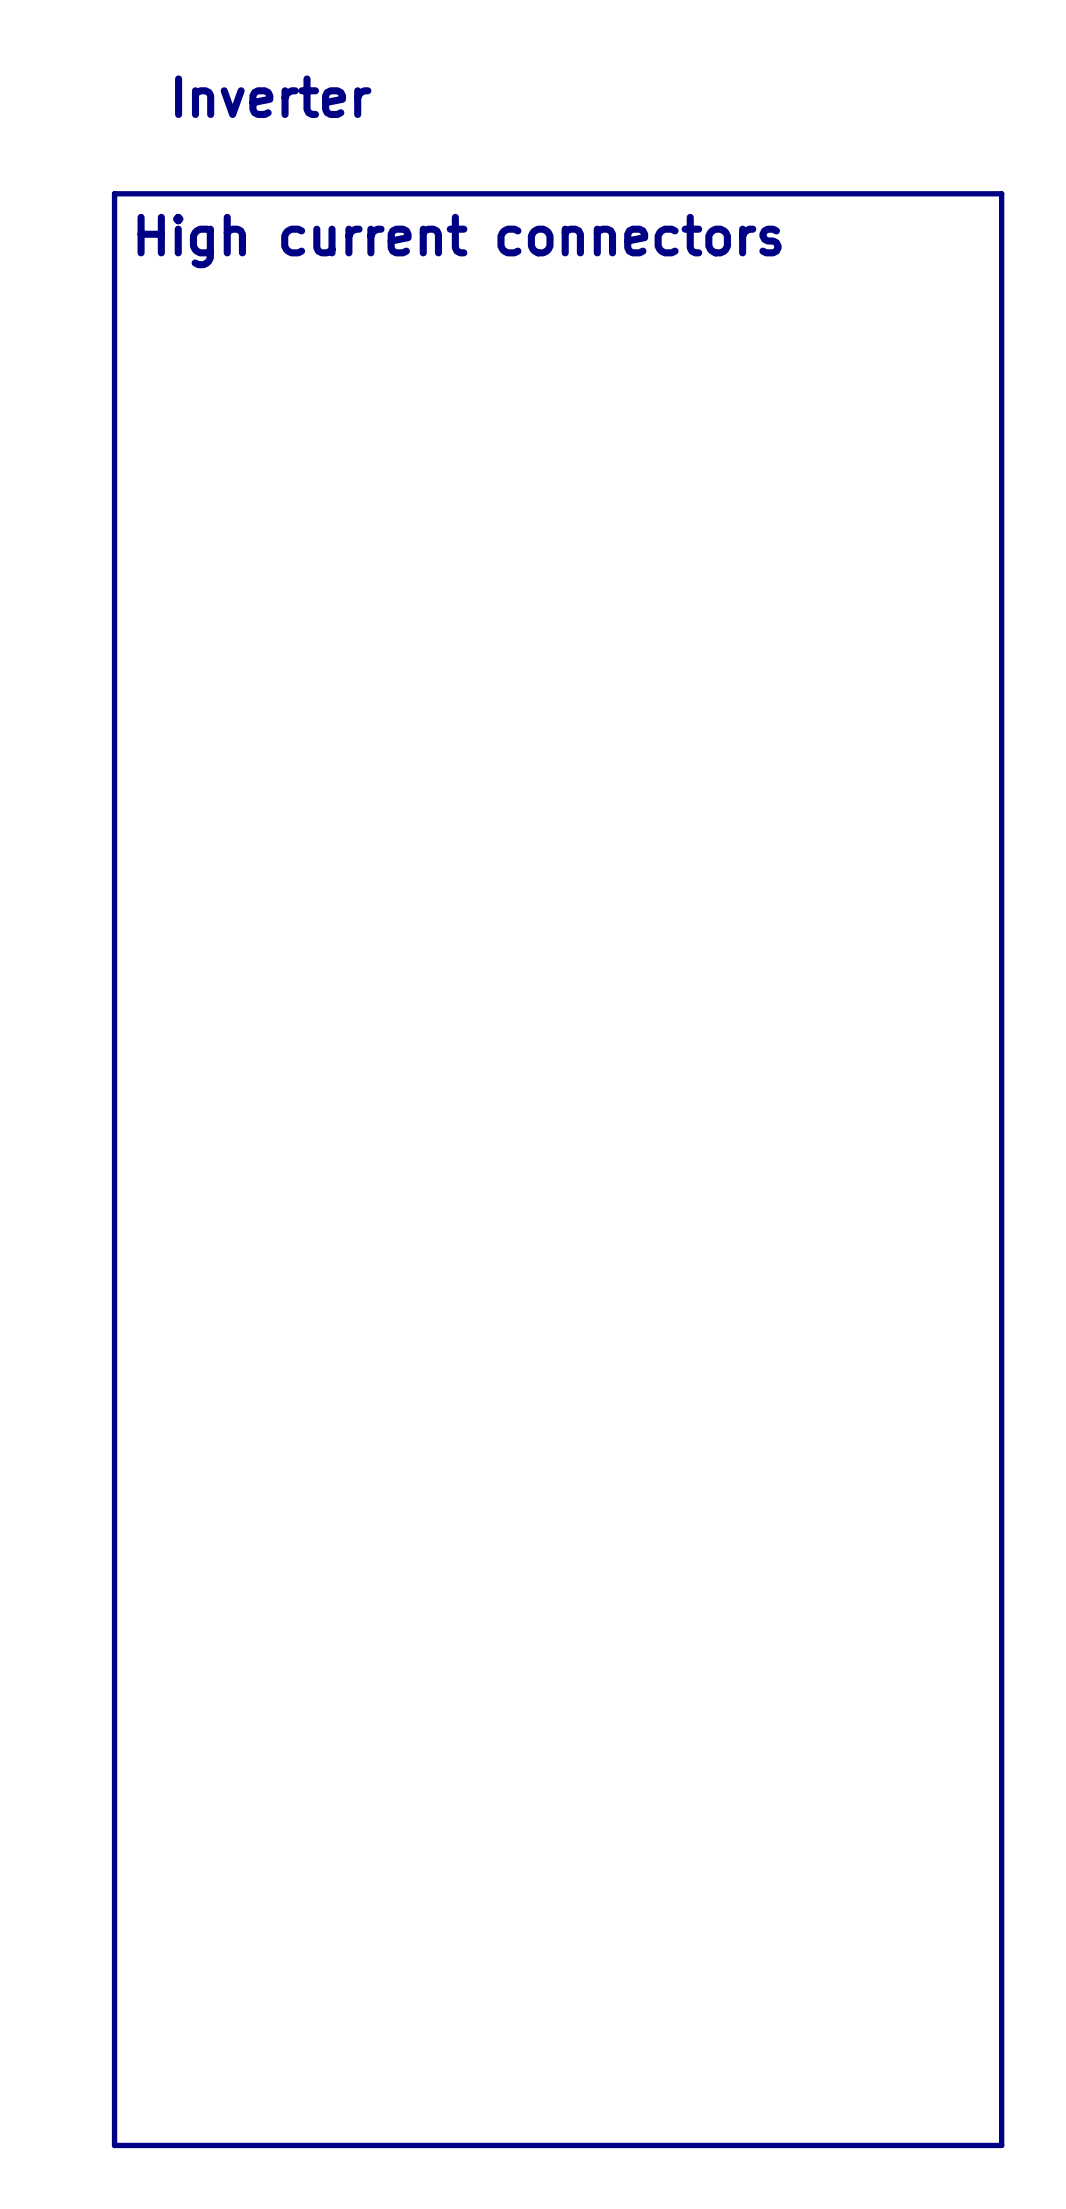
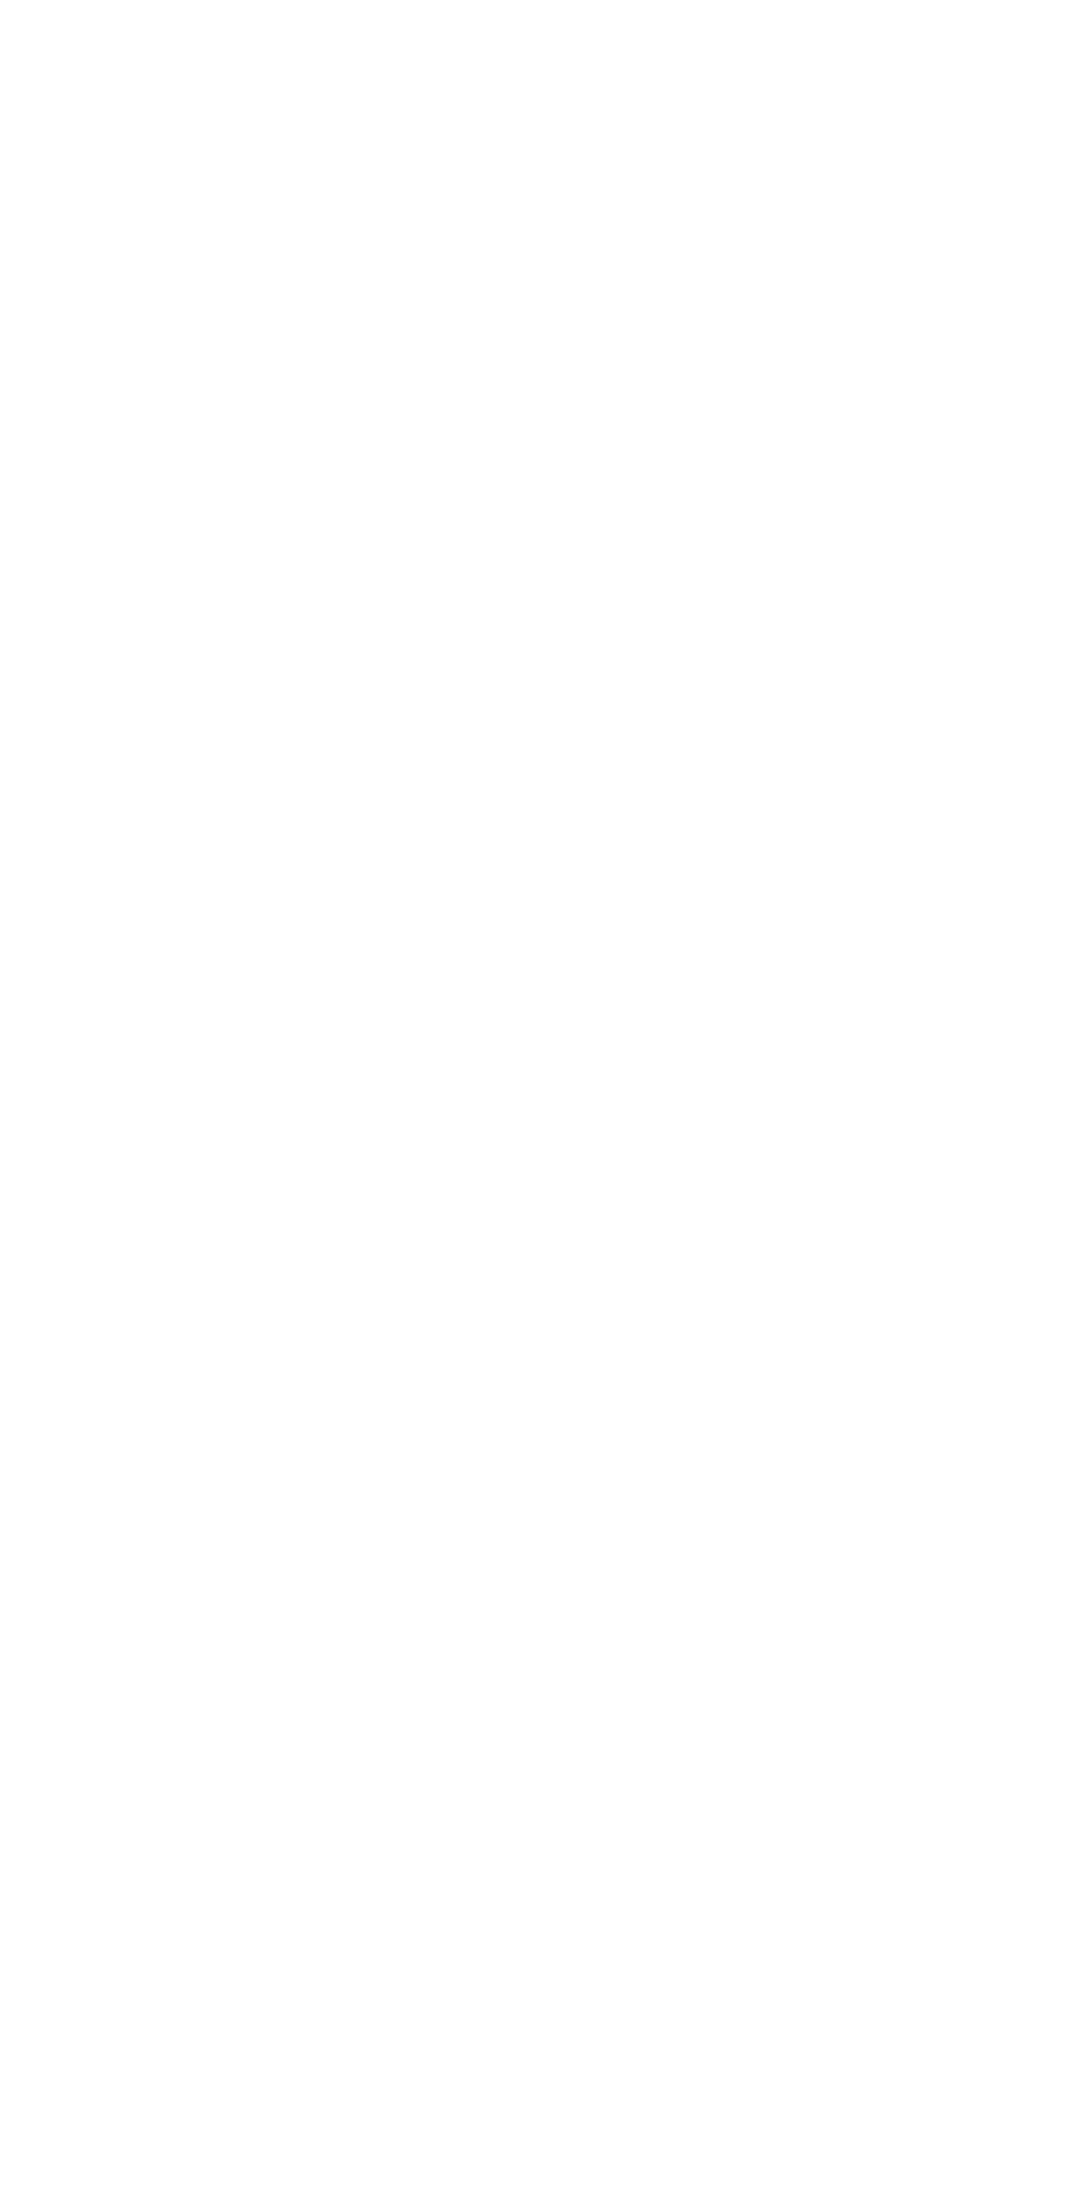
text: Inverter (273, 96) -> none
line: (114, 193) (1001, 193) (1001, 2145) (114, 2145) (114, 193) -> none
text: High current connectors (459, 241) -> none

